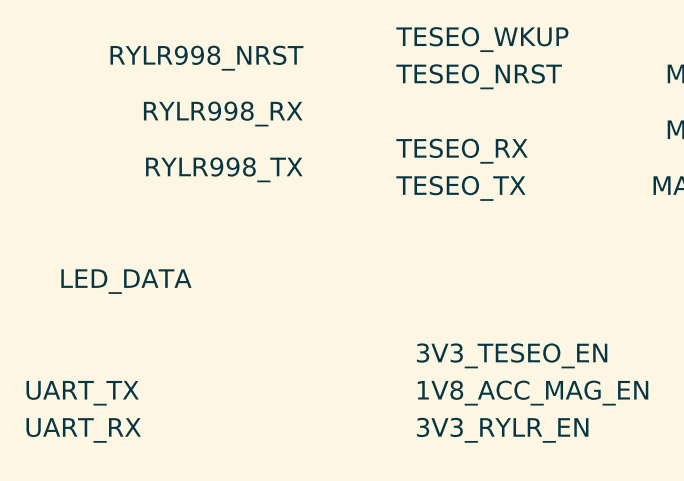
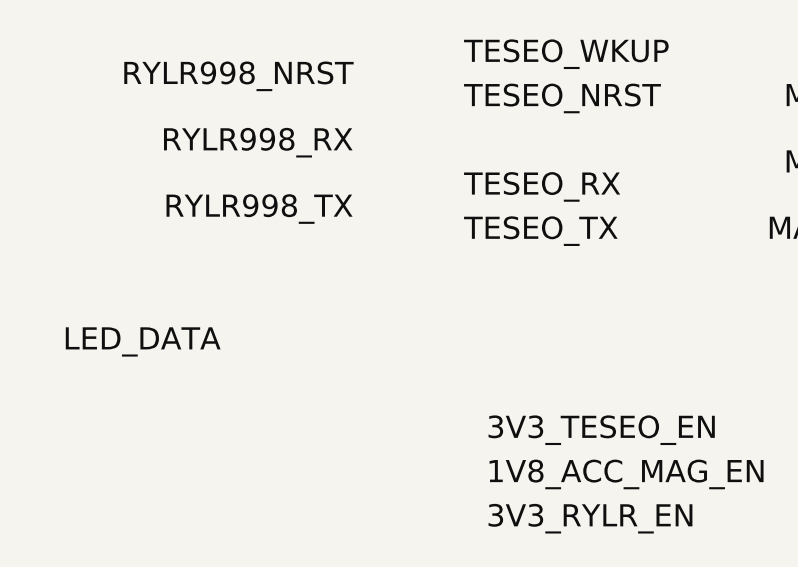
label: UART_TX (82, 393) -> none
label: UART_RX (83, 430) -> none

